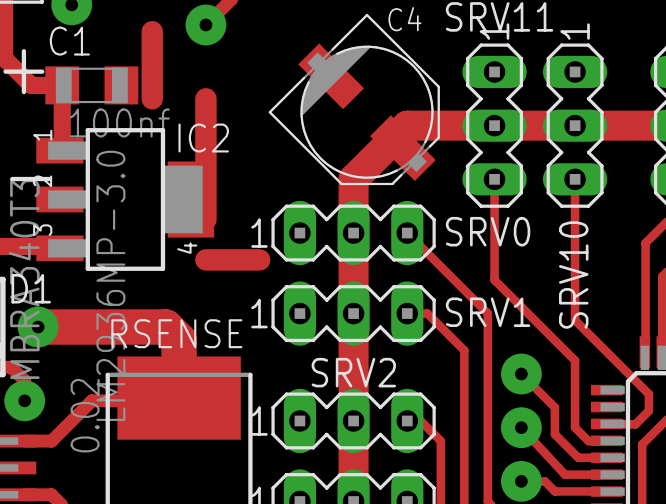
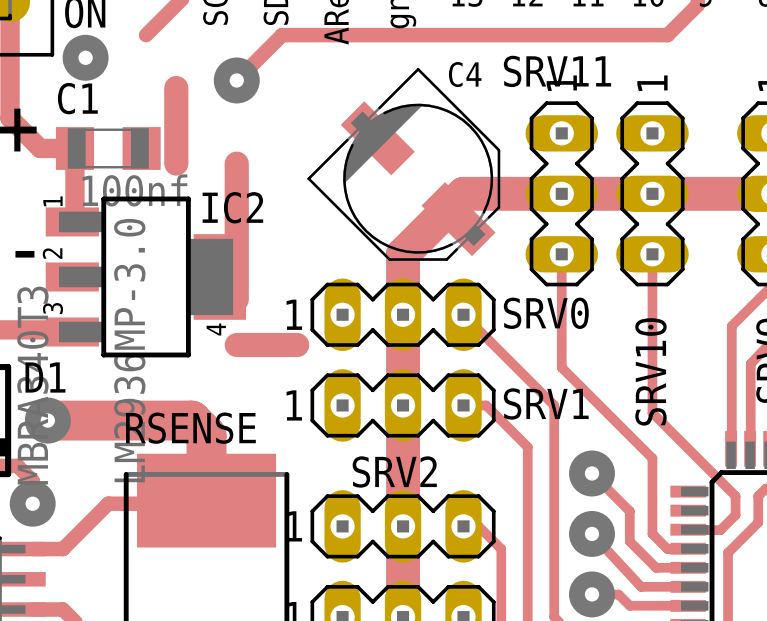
RSENSE value: 0.02 (85, 415) -> none

